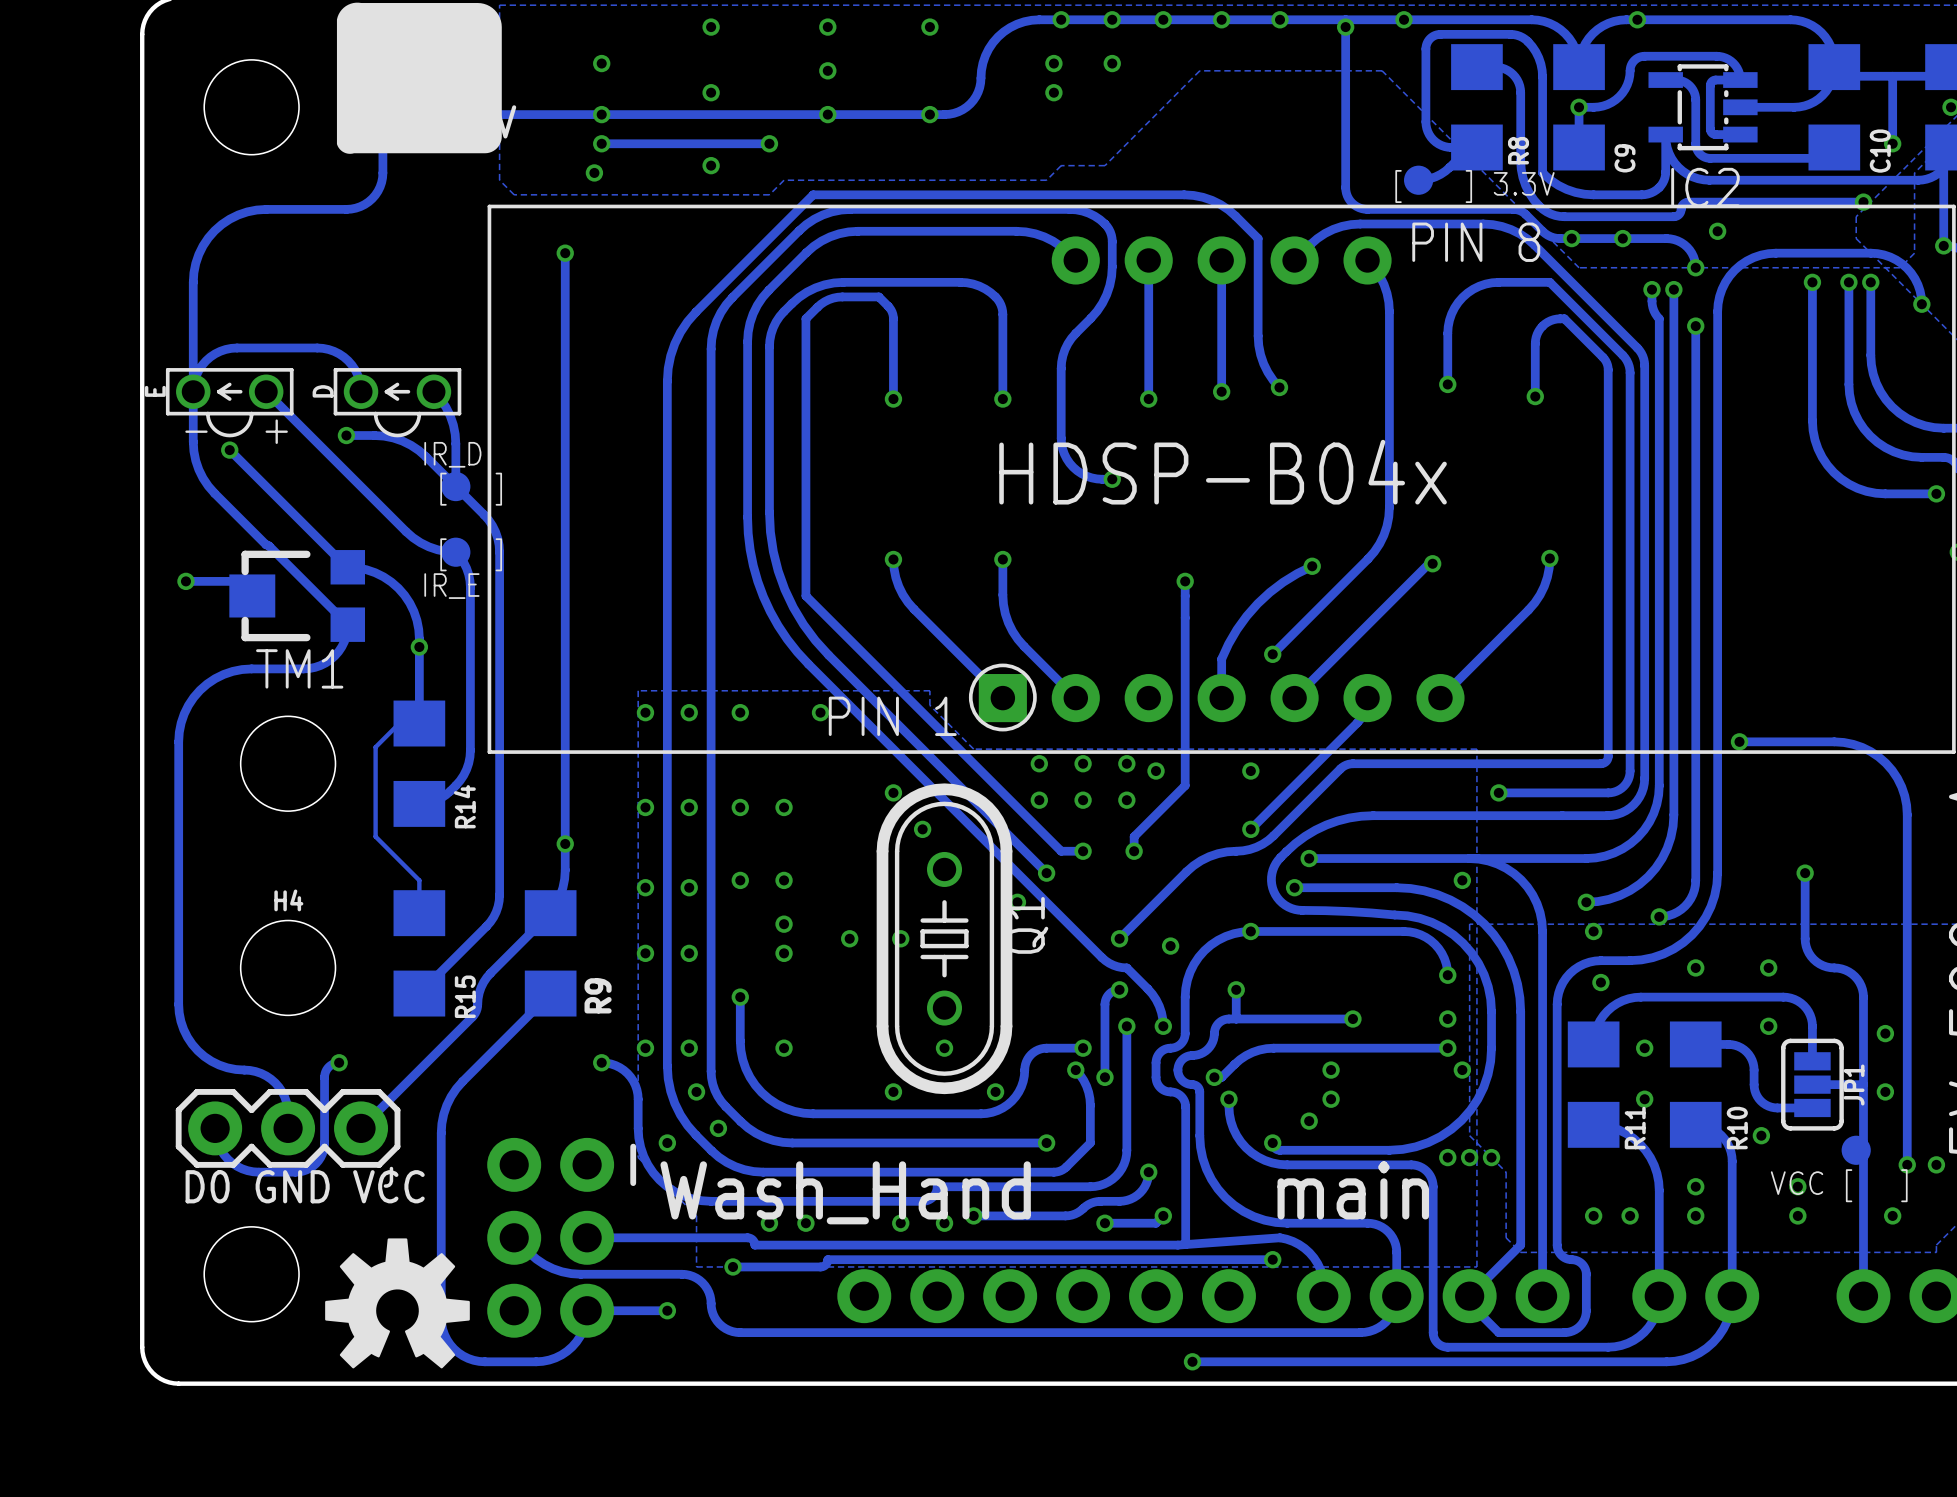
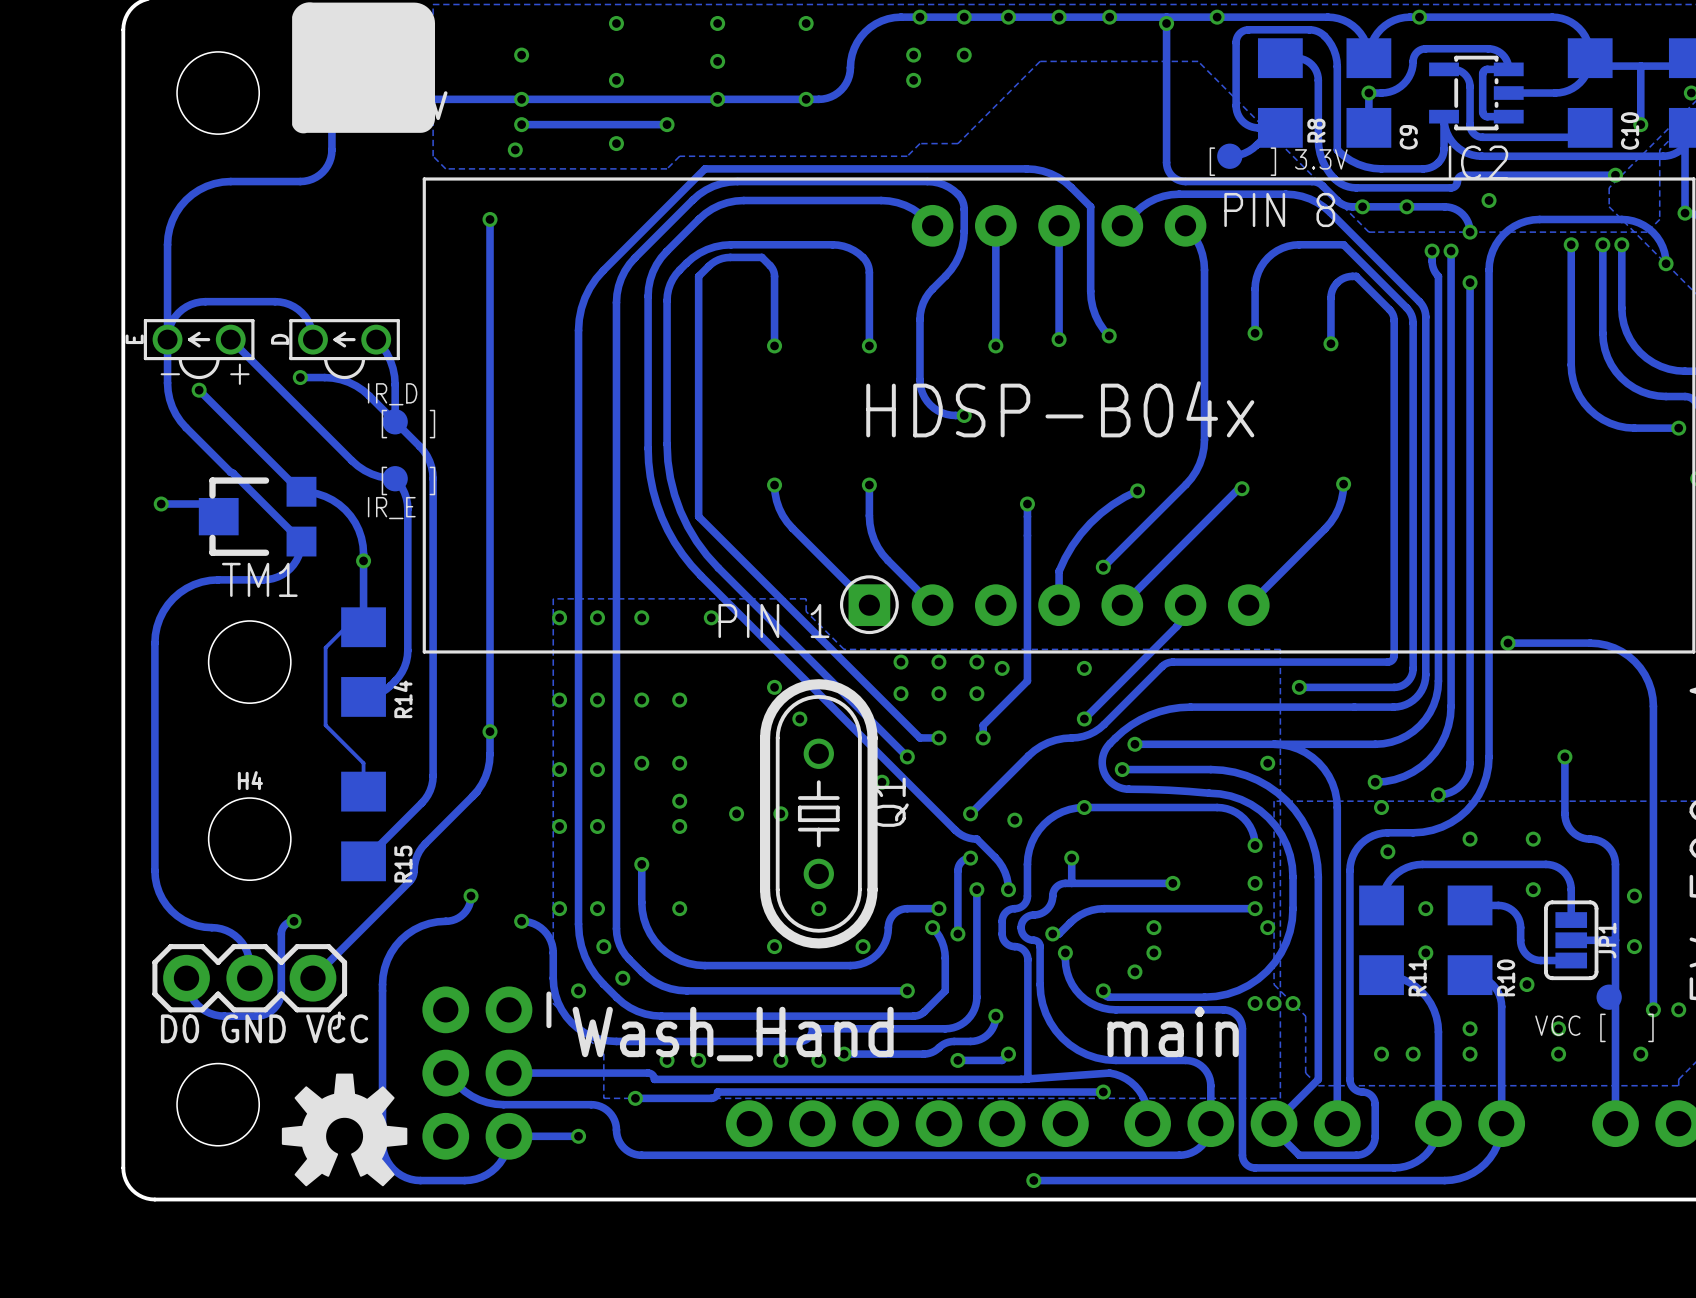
R9: (550, 953) -> none
track: (550, 993) (456, 1088) (443, 1114) (441, 1135) -> (471, 896) (467, 908) (458, 917) (421, 926) (401, 939) (387, 960) (382, 984)
via: none -> (471, 896)

